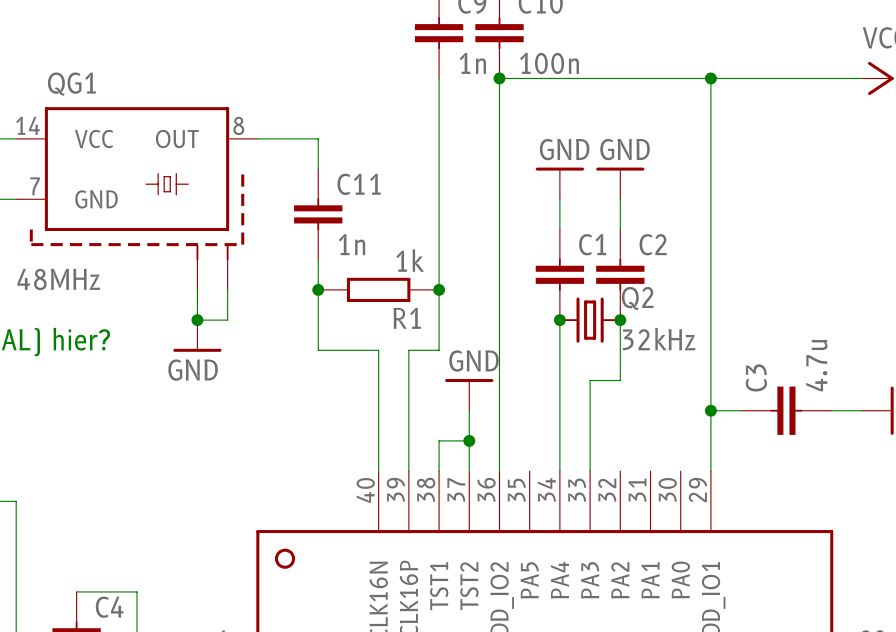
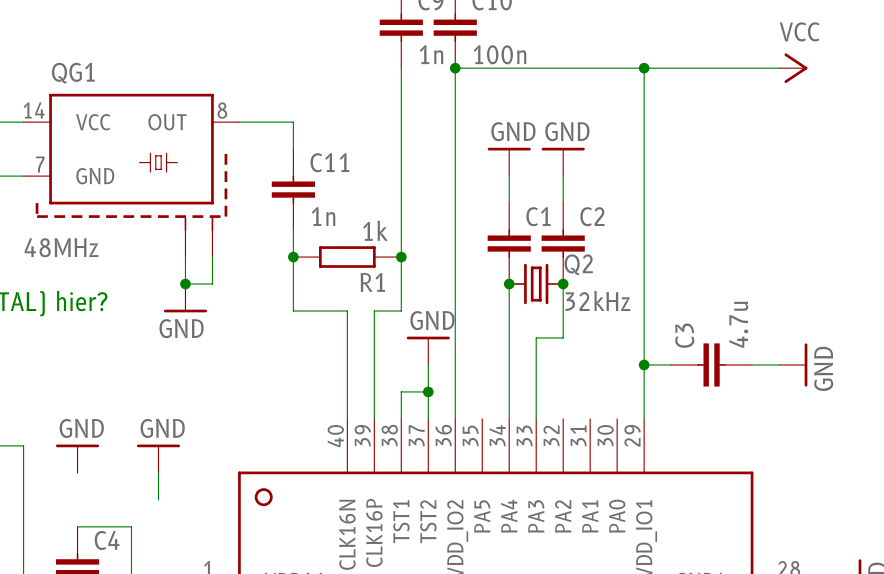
power symbol: none -> GND (77, 458)
power symbol: none -> GND (158, 458)
wire: none -> (158, 472) (158, 499)

